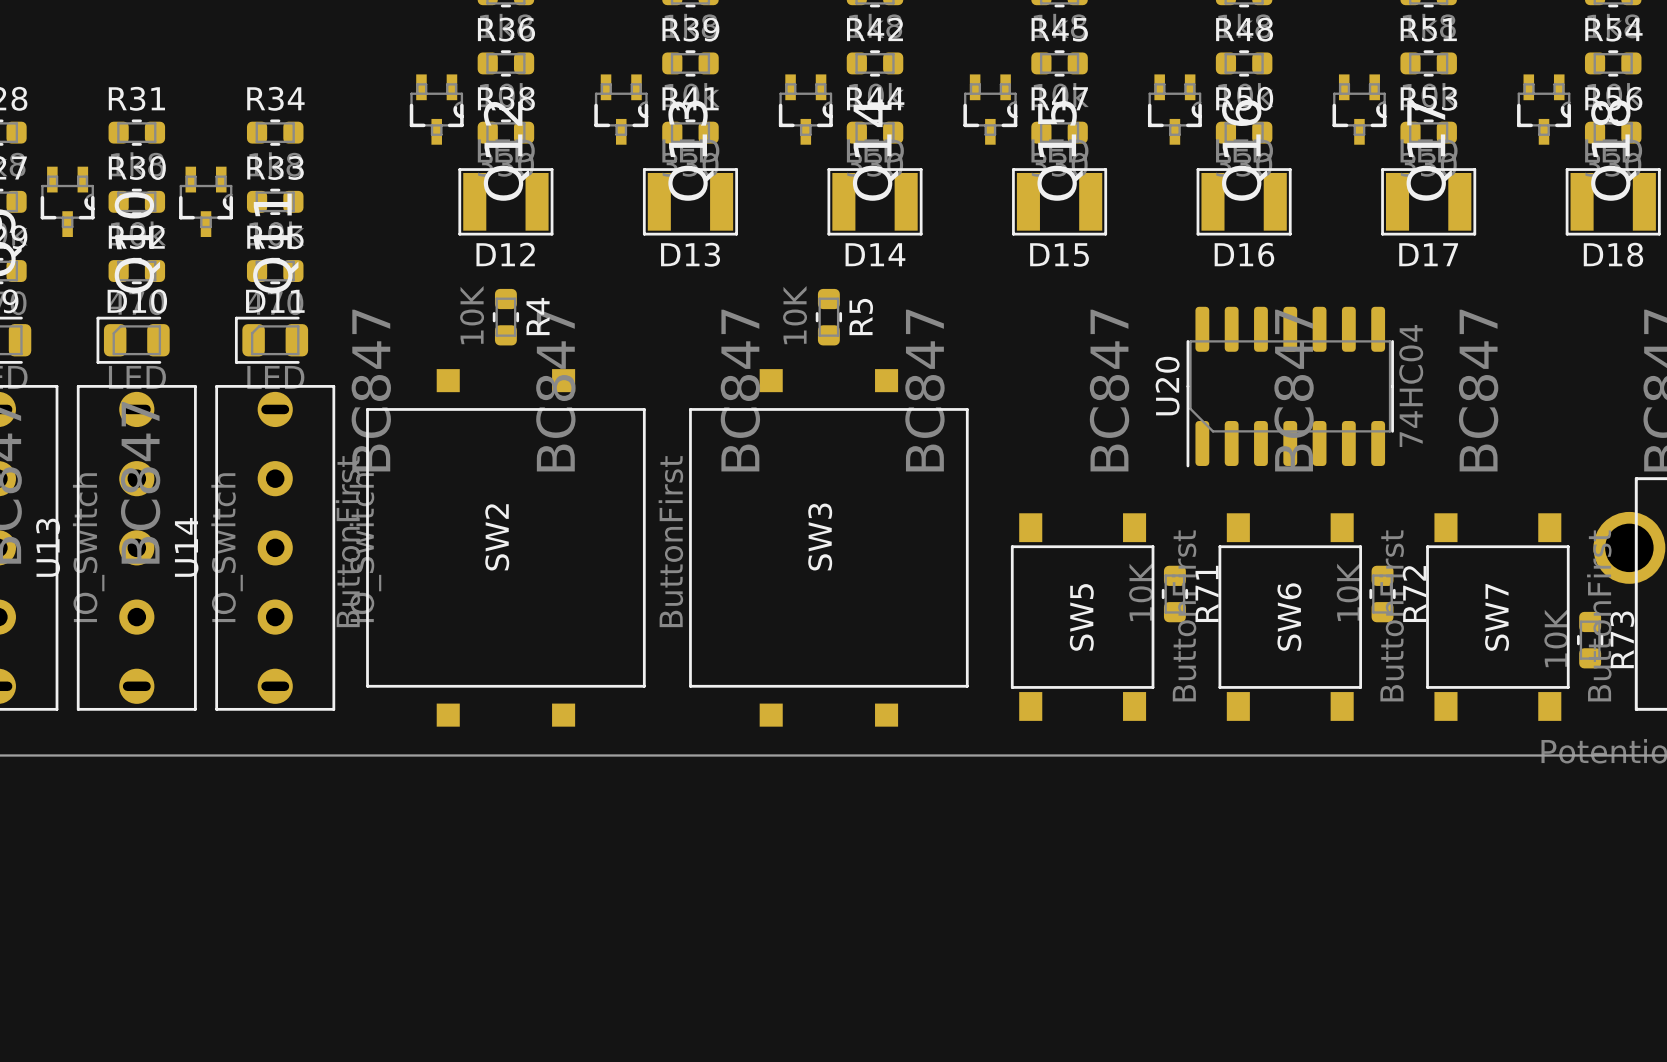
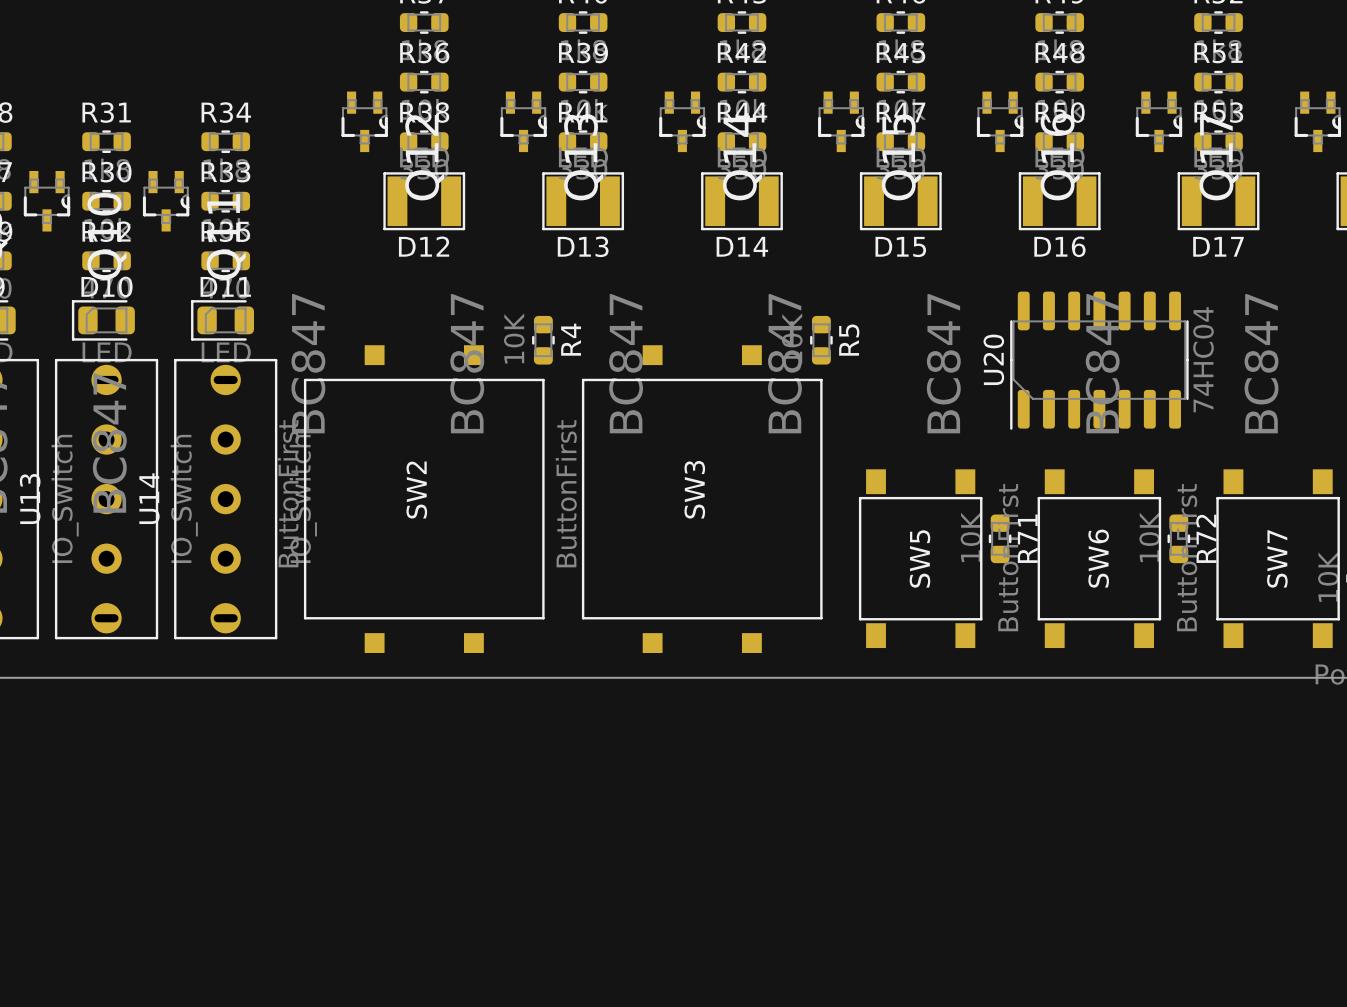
R4 position: (505, 317) -> (543, 340)
R5 position: (828, 317) -> (821, 340)

